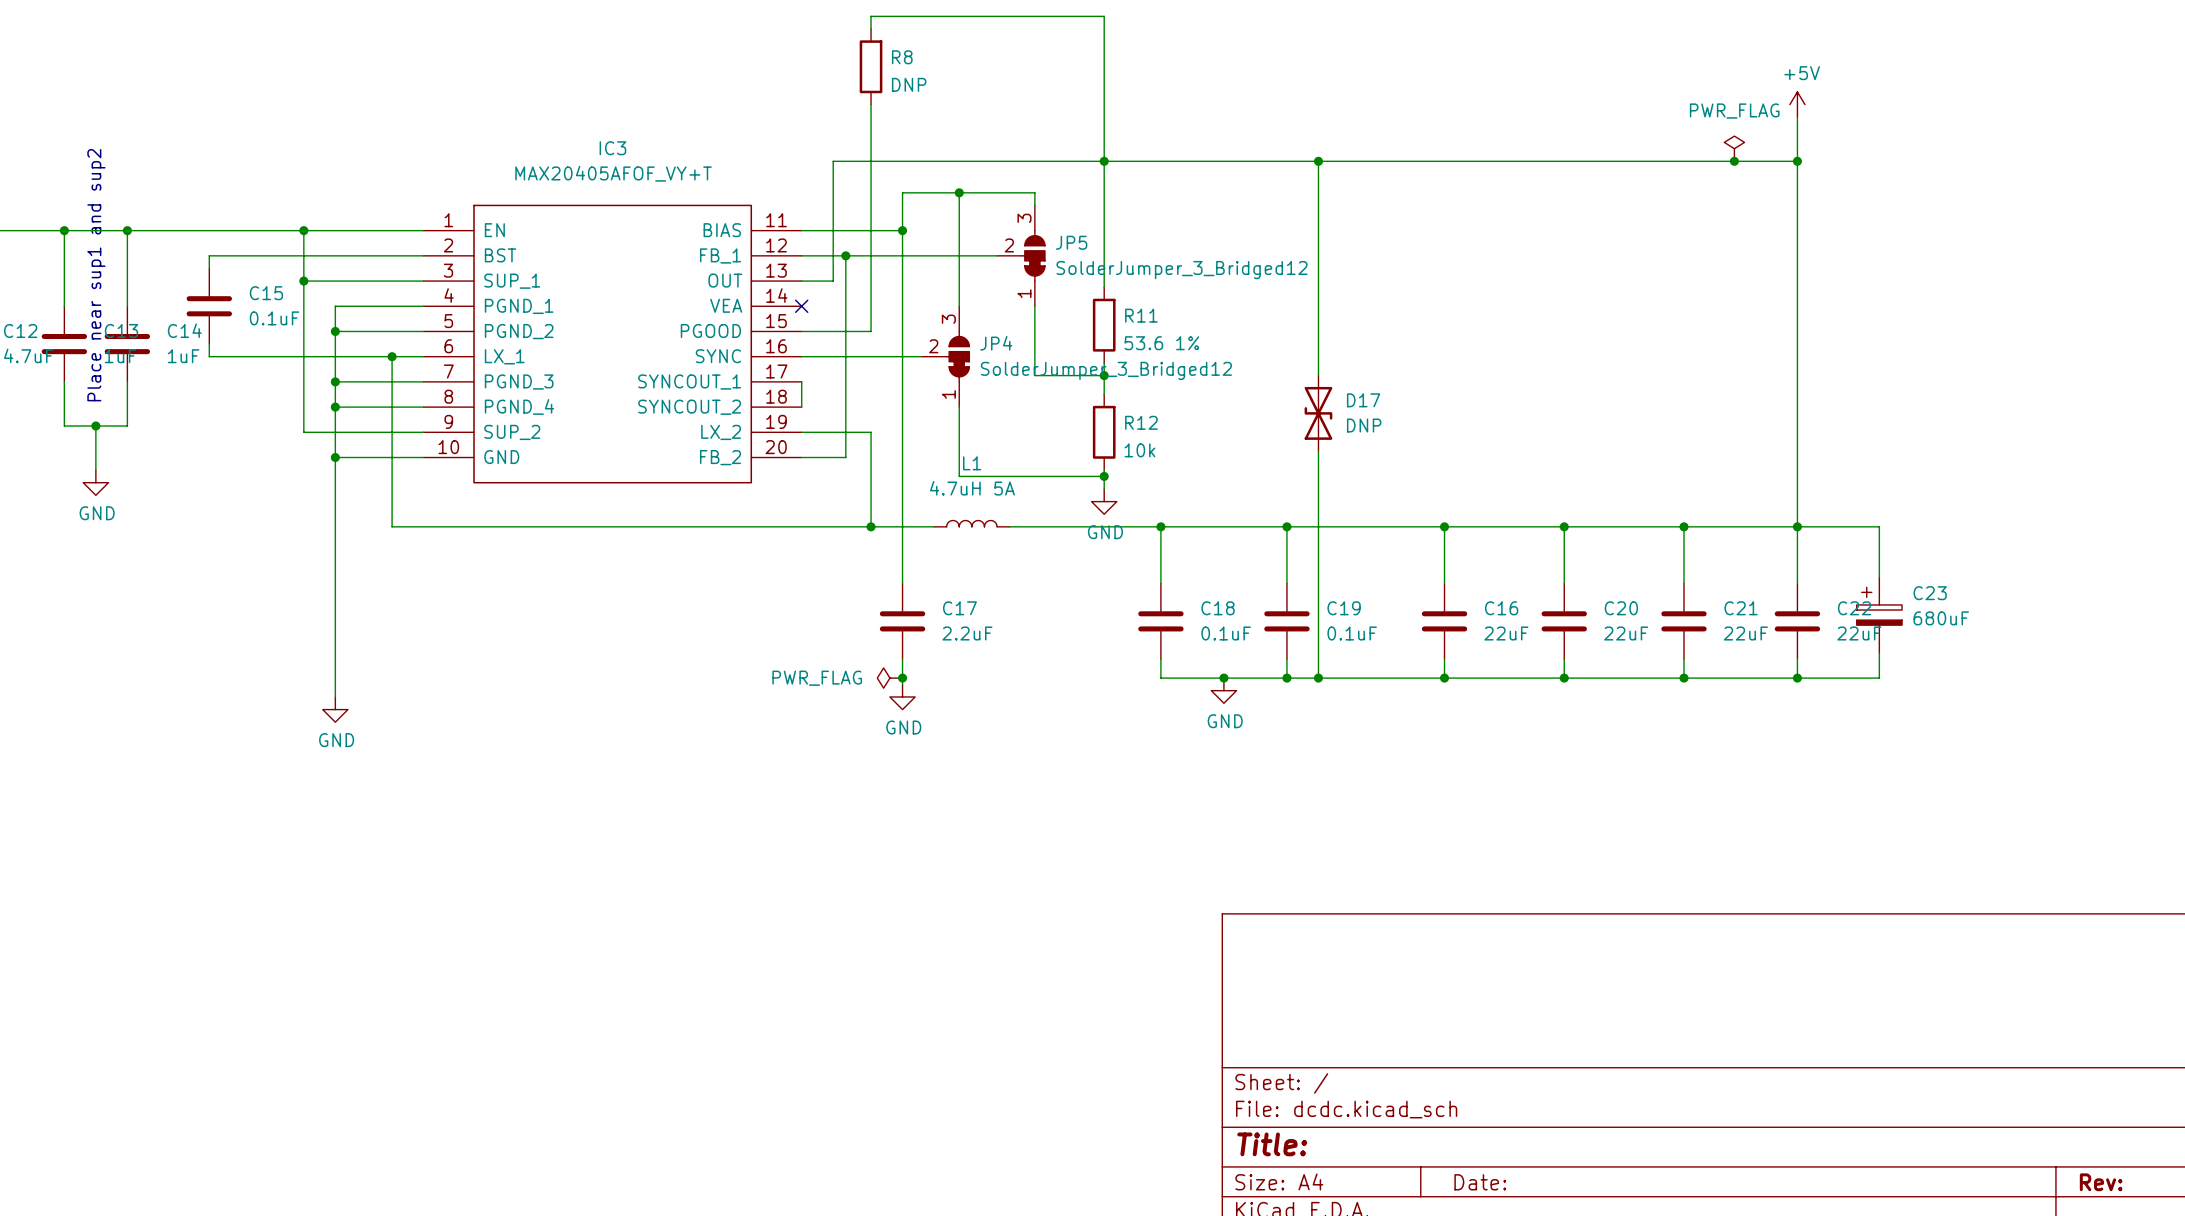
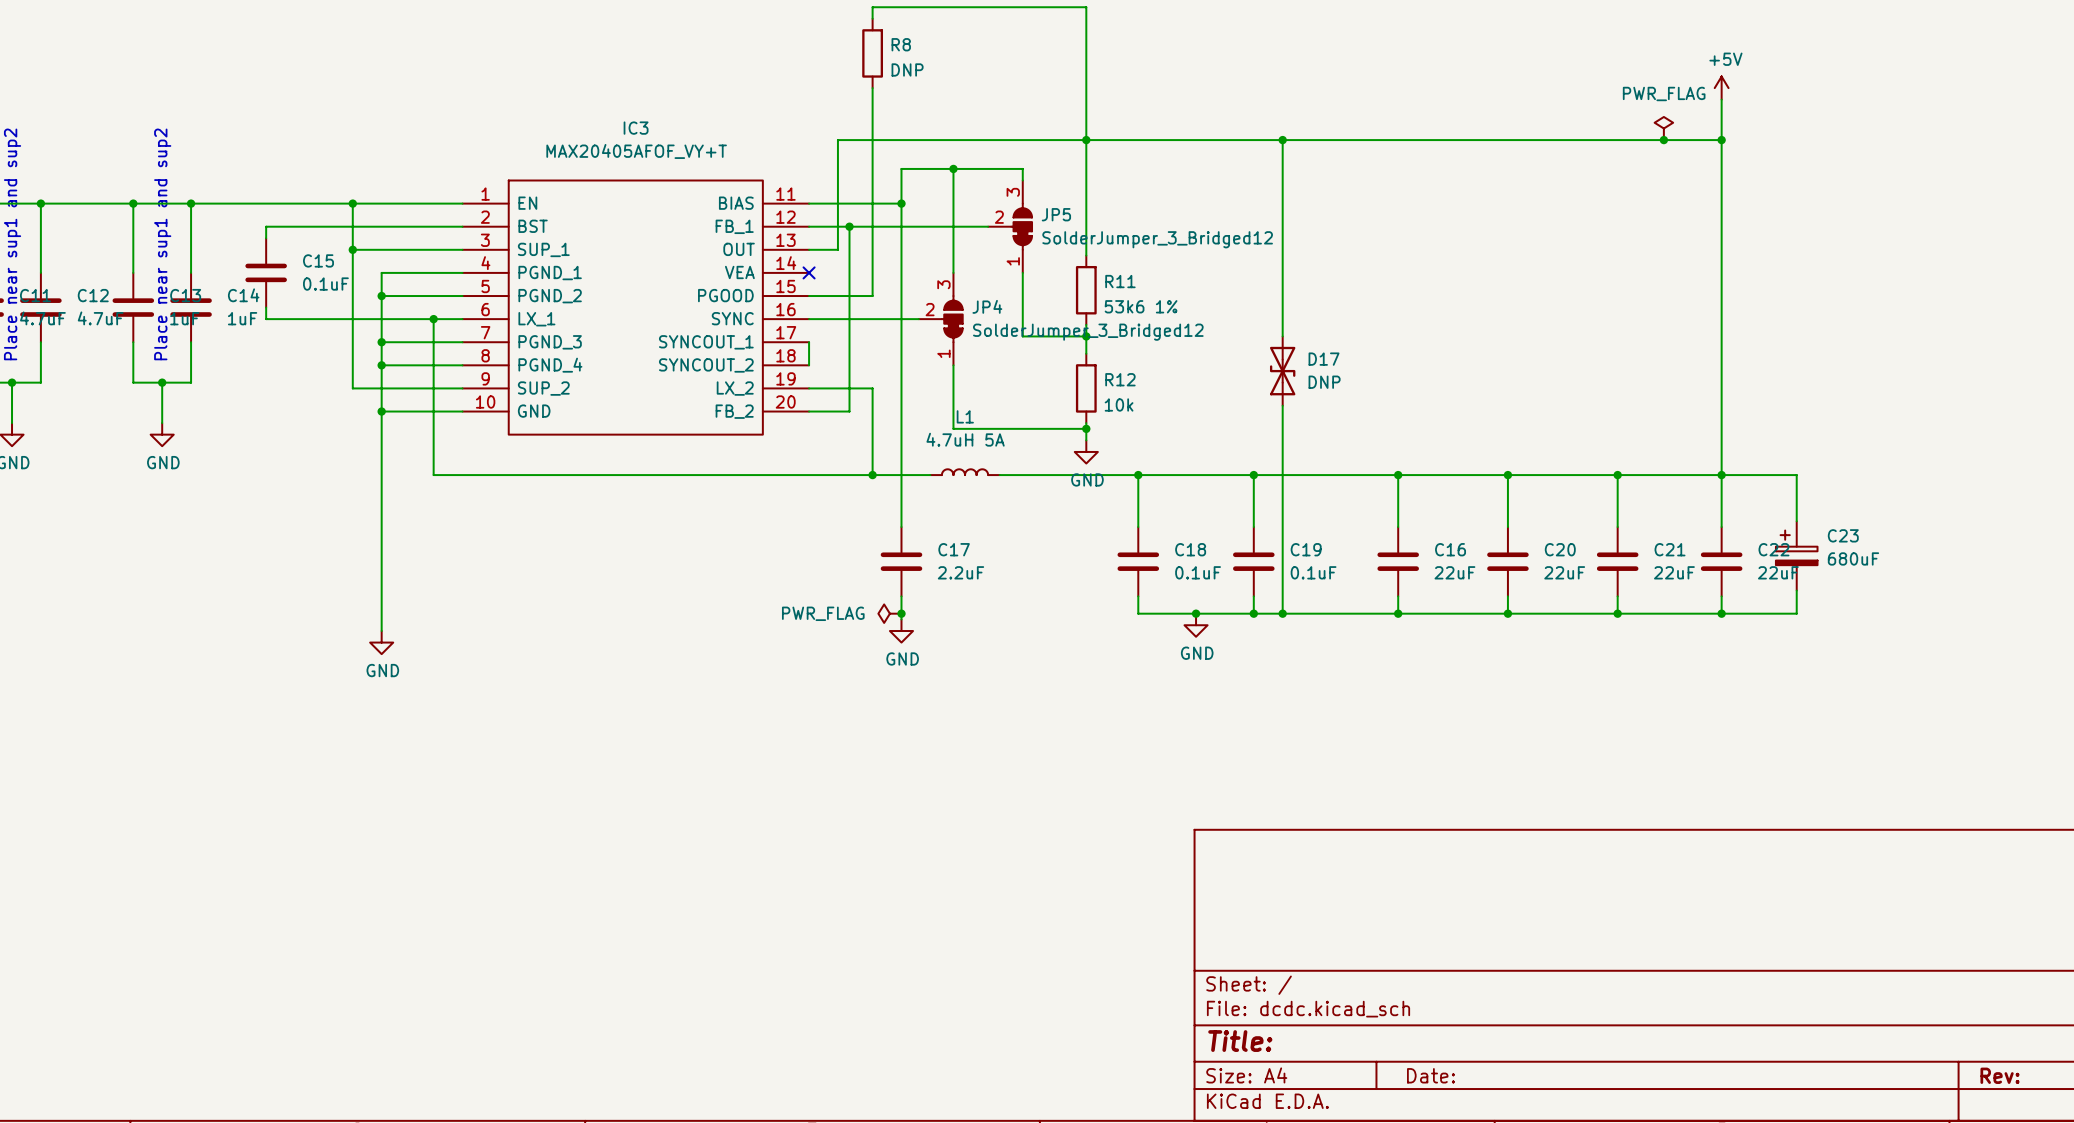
R11 value: 53.6 1% (1161, 343) -> 53k6 1% (1141, 306)

